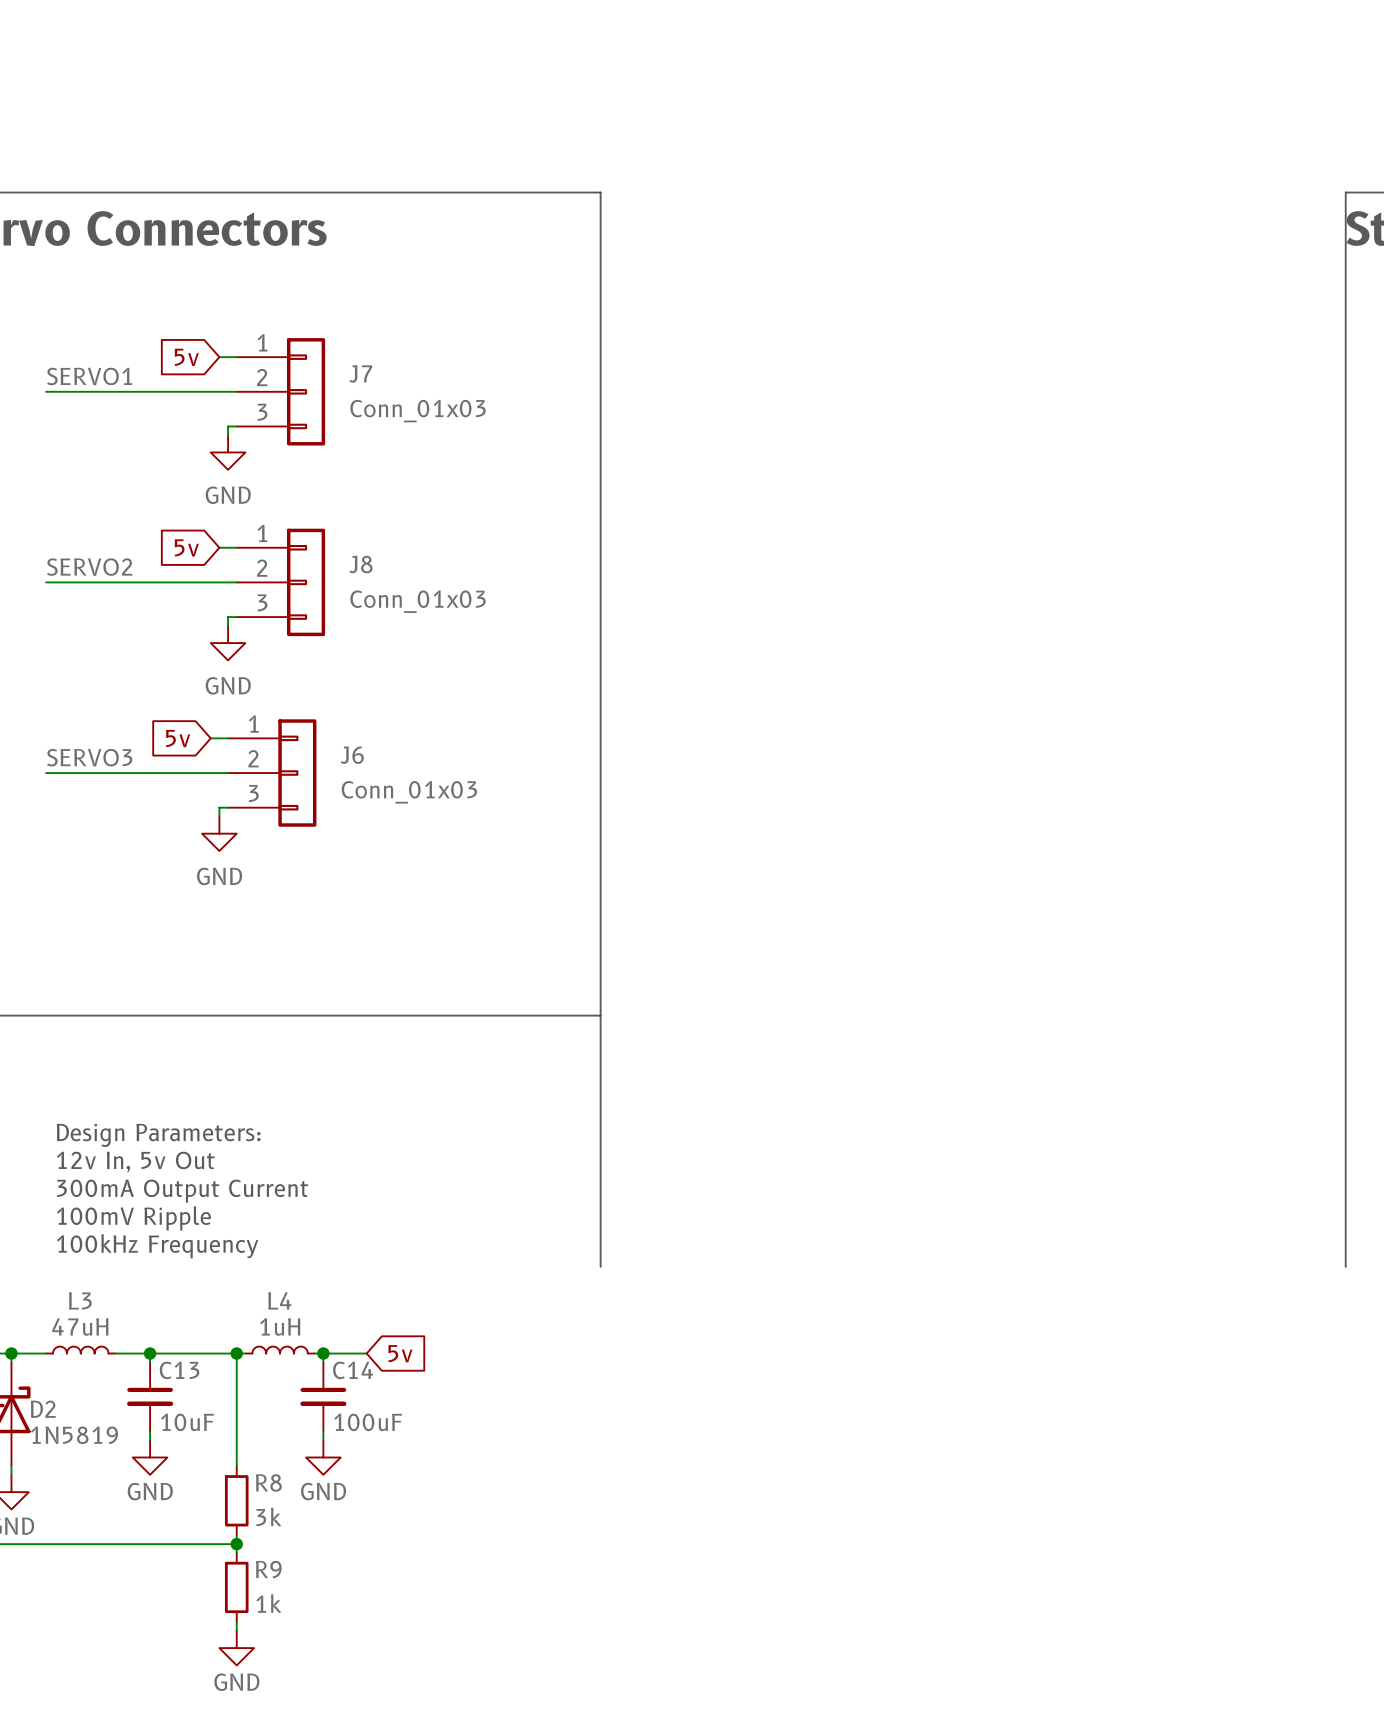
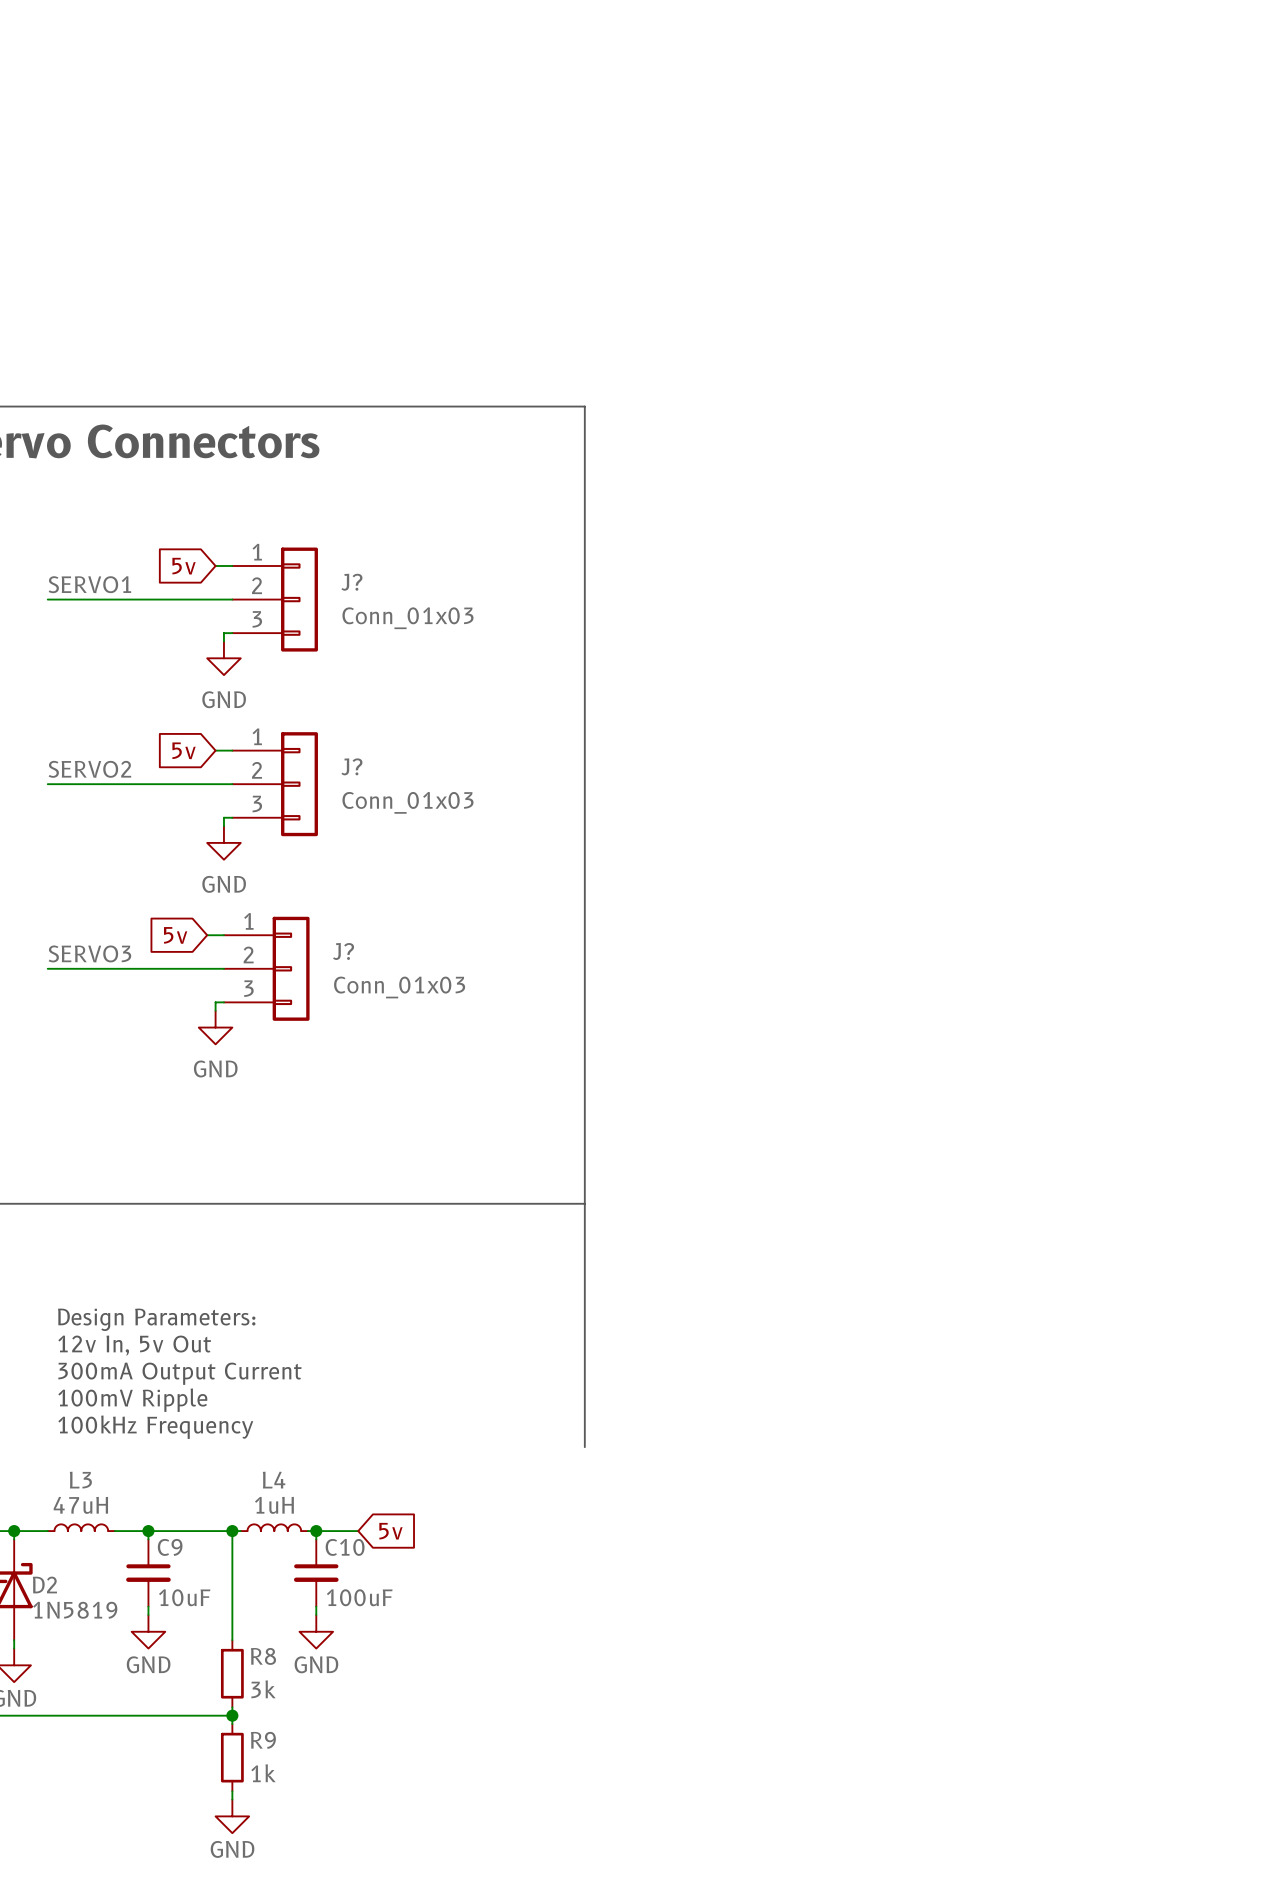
J7 name: J7 (360, 373) -> J? (351, 582)
J8 name: J8 (360, 564) -> J? (351, 766)
J6 name: J6 (352, 755) -> J? (343, 951)
C13 name: C13 (179, 1370) -> C9 (170, 1547)
C14 name: C14 (353, 1370) -> C10 (345, 1547)

